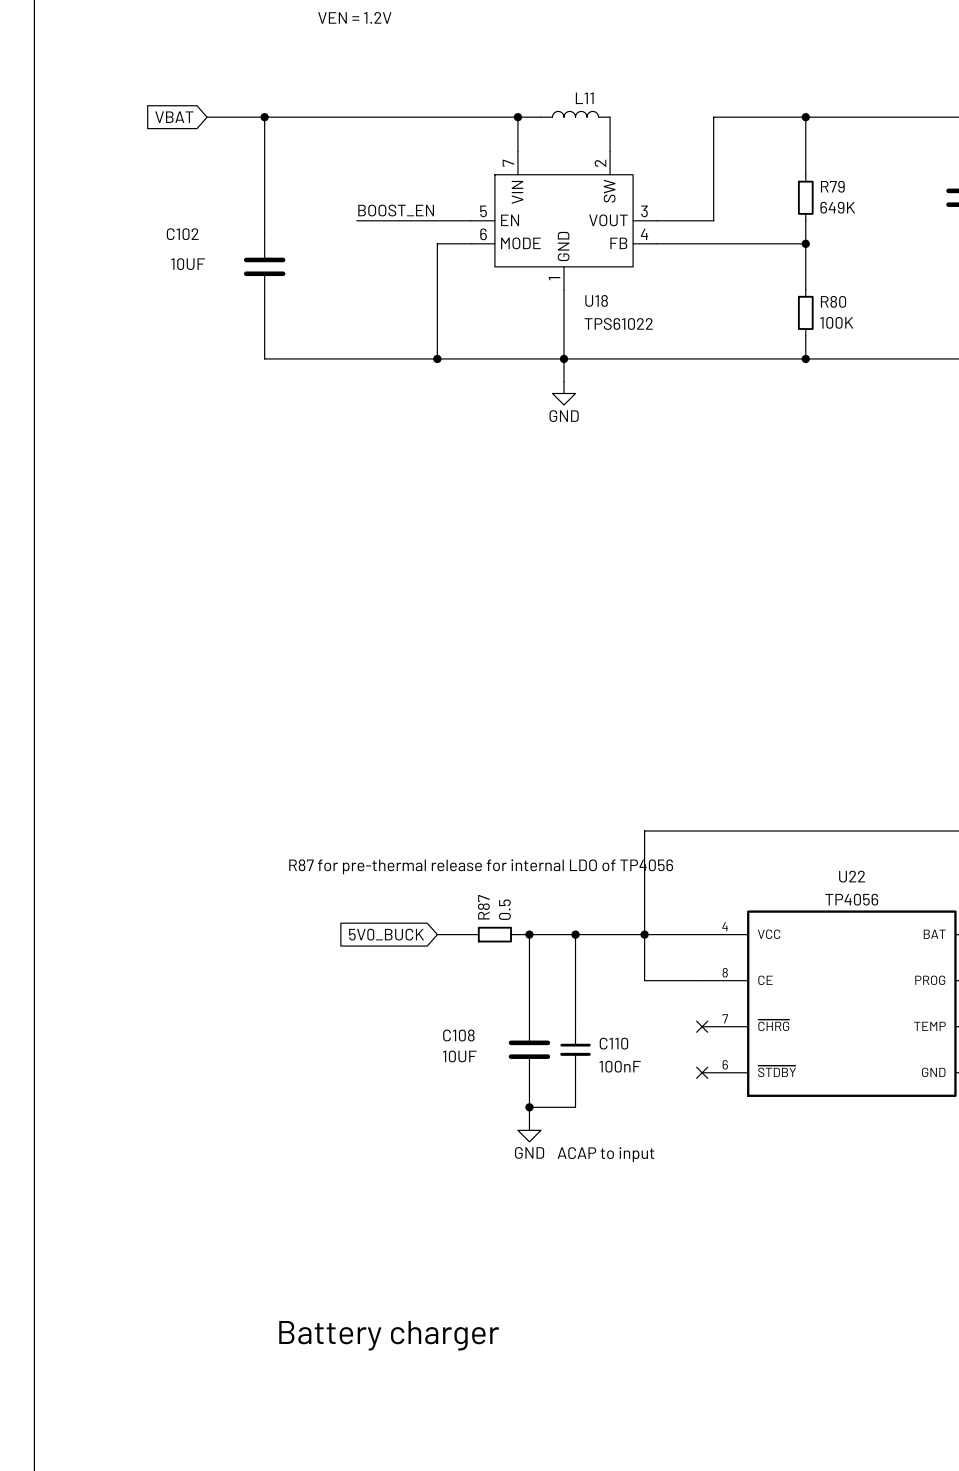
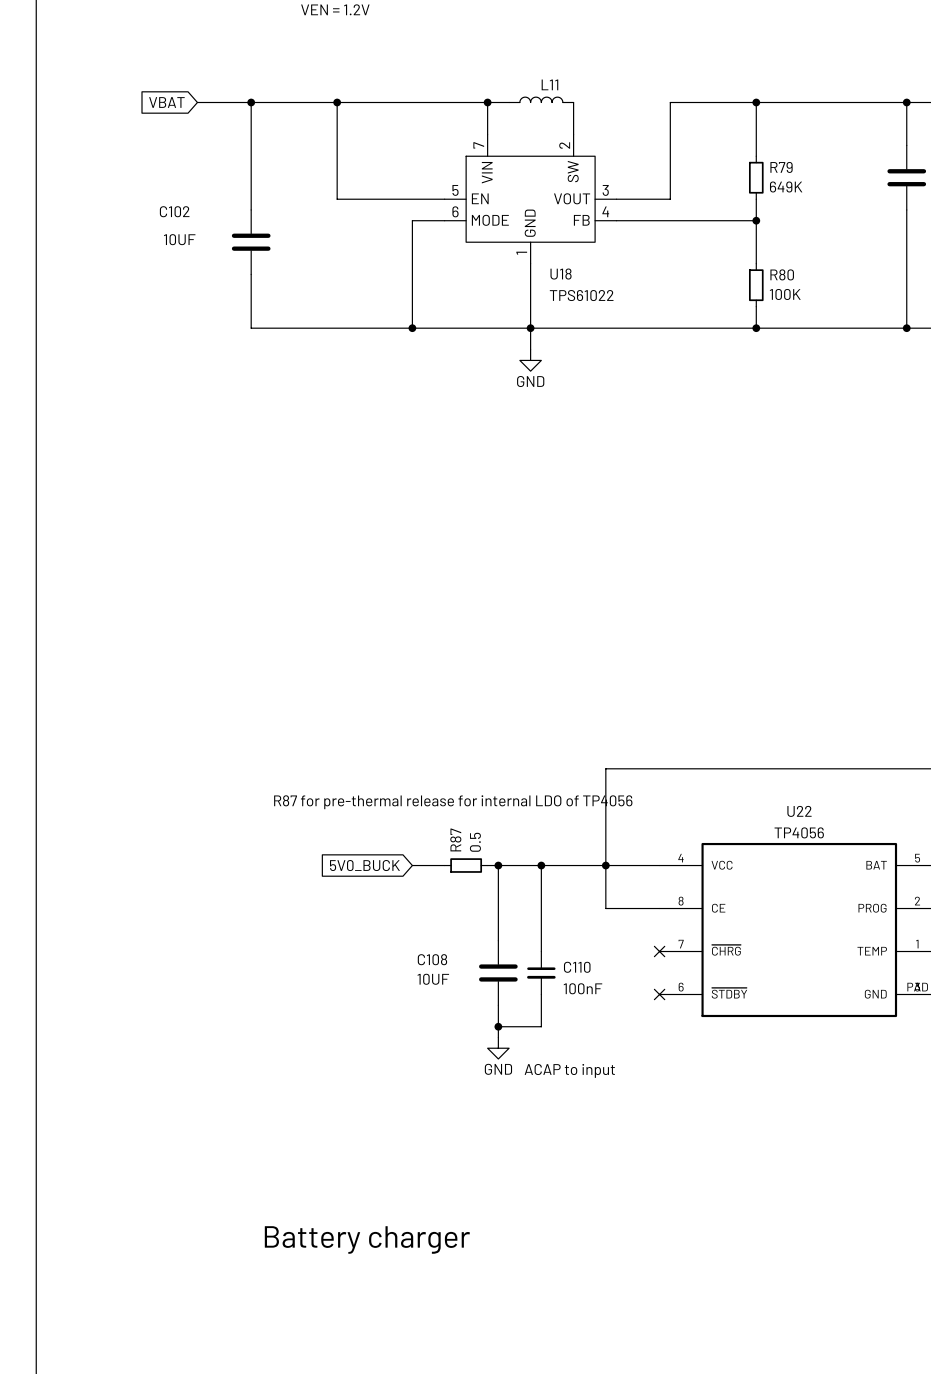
wire: none -> (337, 102) (337, 199)
junction: none -> (337, 102)
label: BOOST_EN (396, 210) -> none

